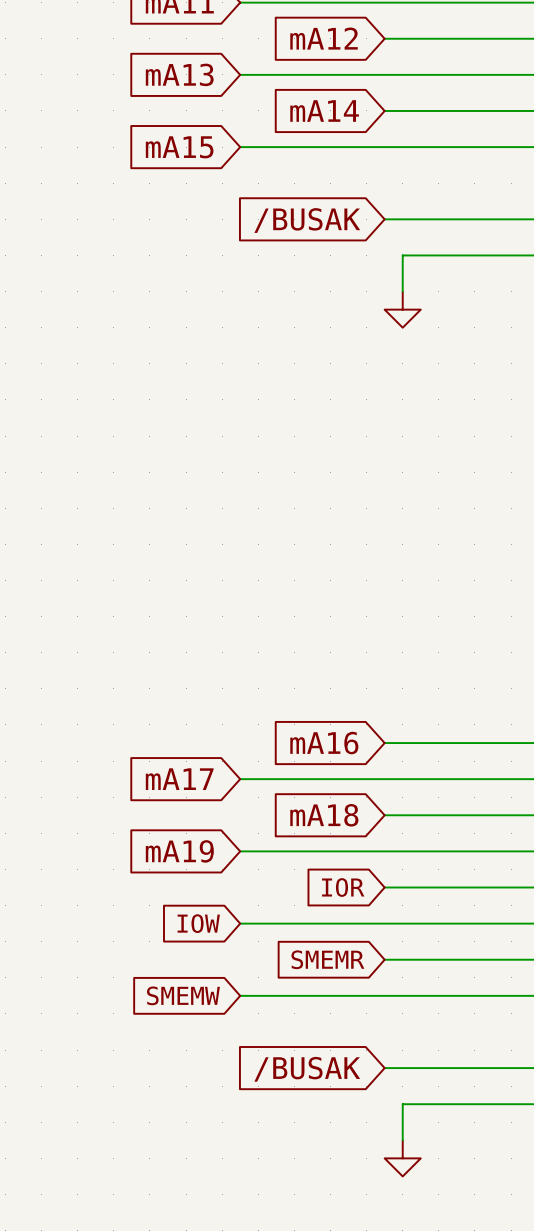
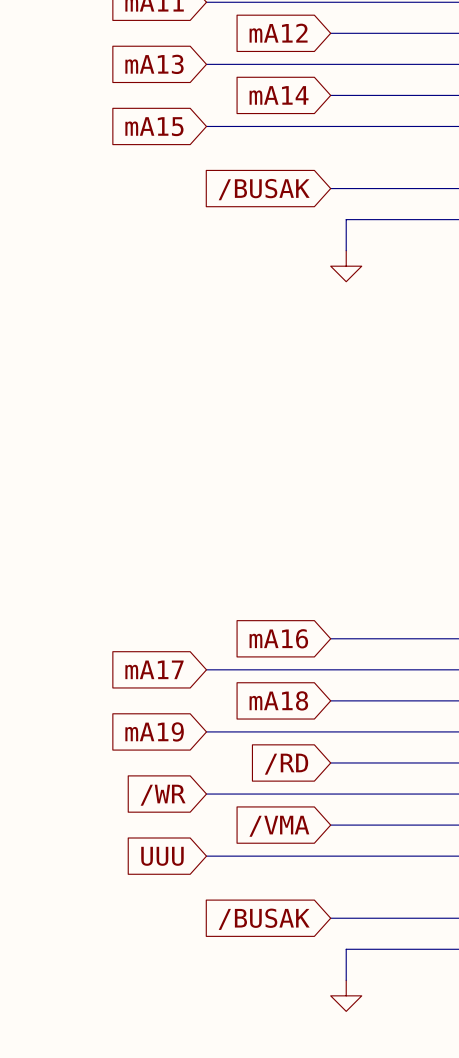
global label: IOR (343, 887) -> /RD (286, 764)
global label: IOW (198, 923) -> /WR (163, 795)
global label: SMEMR (327, 959) -> /VMA (279, 826)
global label: SMEMW (183, 995) -> UUU (162, 856)

